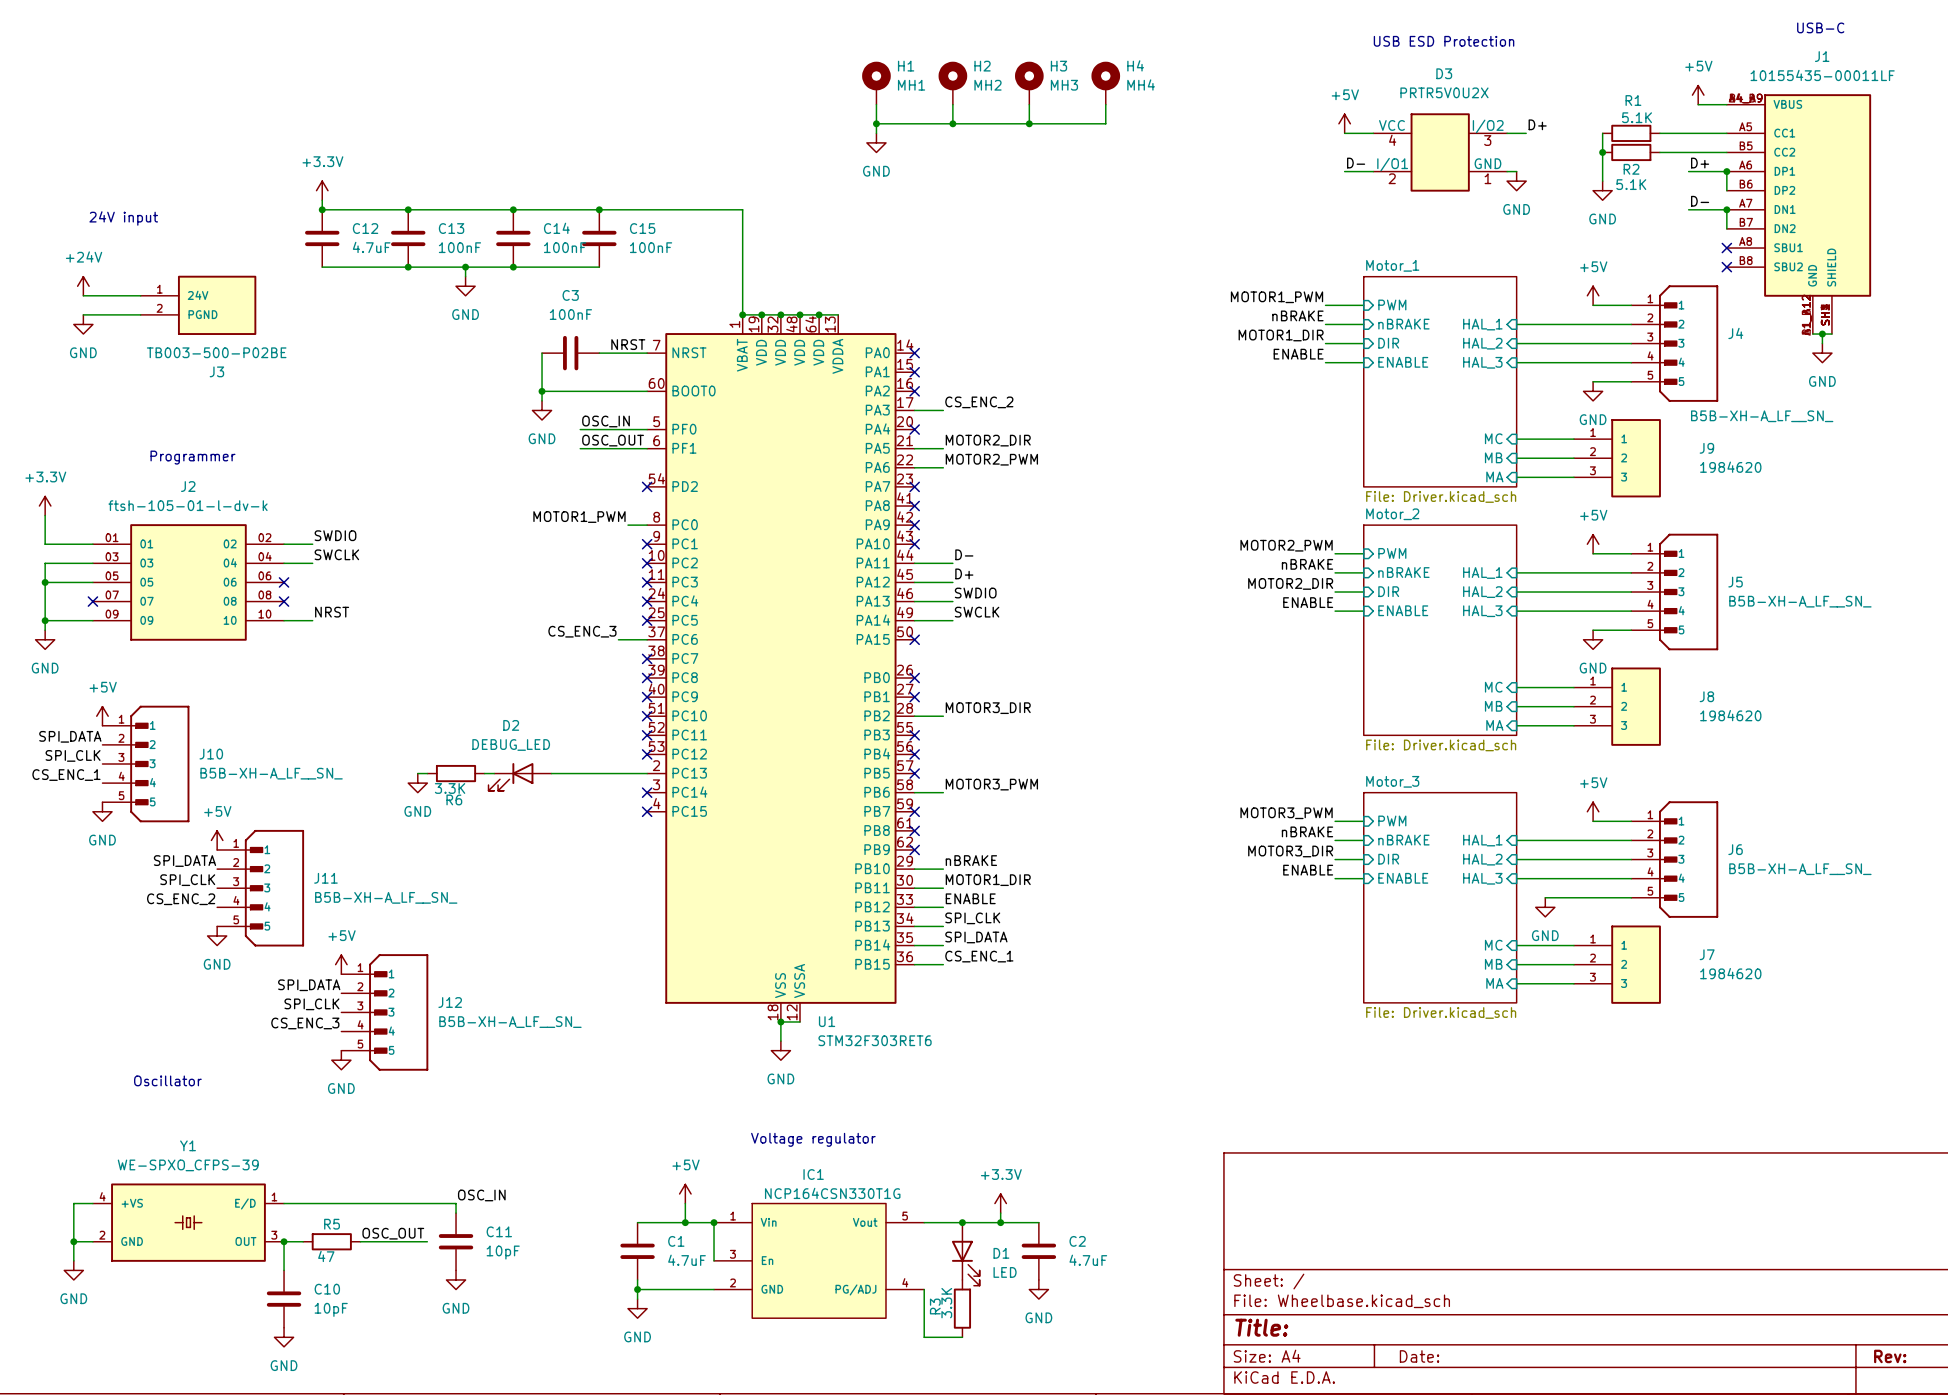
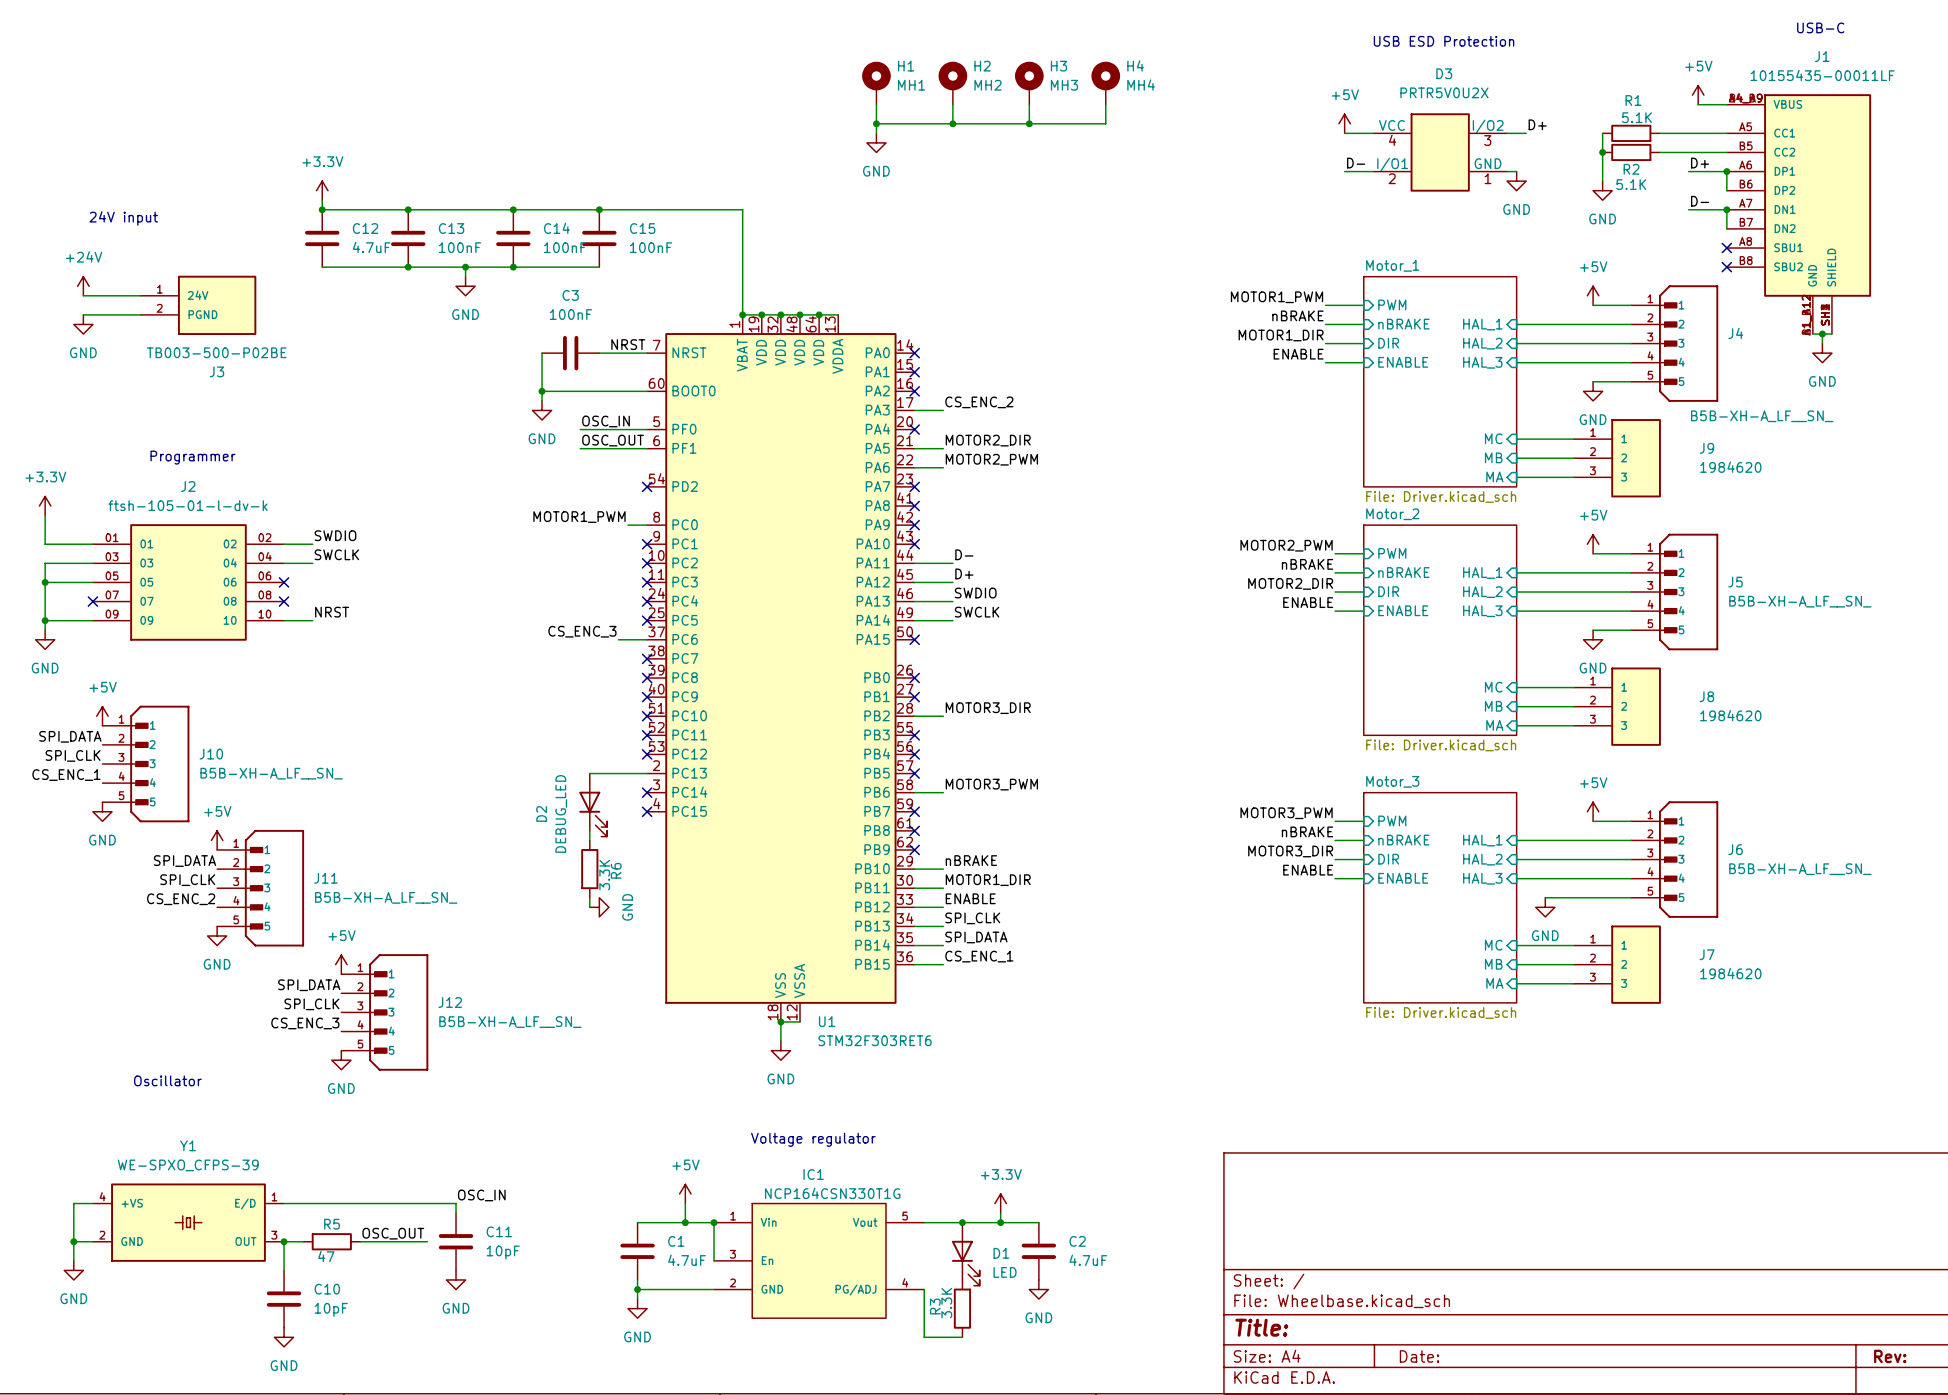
wire: (417, 773) (427, 773) -> none
R6 rotation: 0° (456, 773) -> 90° clockwise (589, 869)
R6 position: (456, 773) -> (589, 869)
wire: (484, 773) (494, 773) -> none
wire: (551, 773) (589, 773) -> none
D2 rotation: 0° (510, 776) -> 90° counterclockwise (593, 814)
D2 position: (520, 776) -> (593, 805)
power symbol: GND (417, 783) -> none
R6 value position: 3.3K (450, 788) -> 3.3K (604, 875)
R6 name position: R6 (454, 799) -> R6 (616, 870)
wire: none -> (589, 830) (589, 840)
wire: none -> (589, 897) (589, 907)
power symbol: none -> GND (599, 907)

